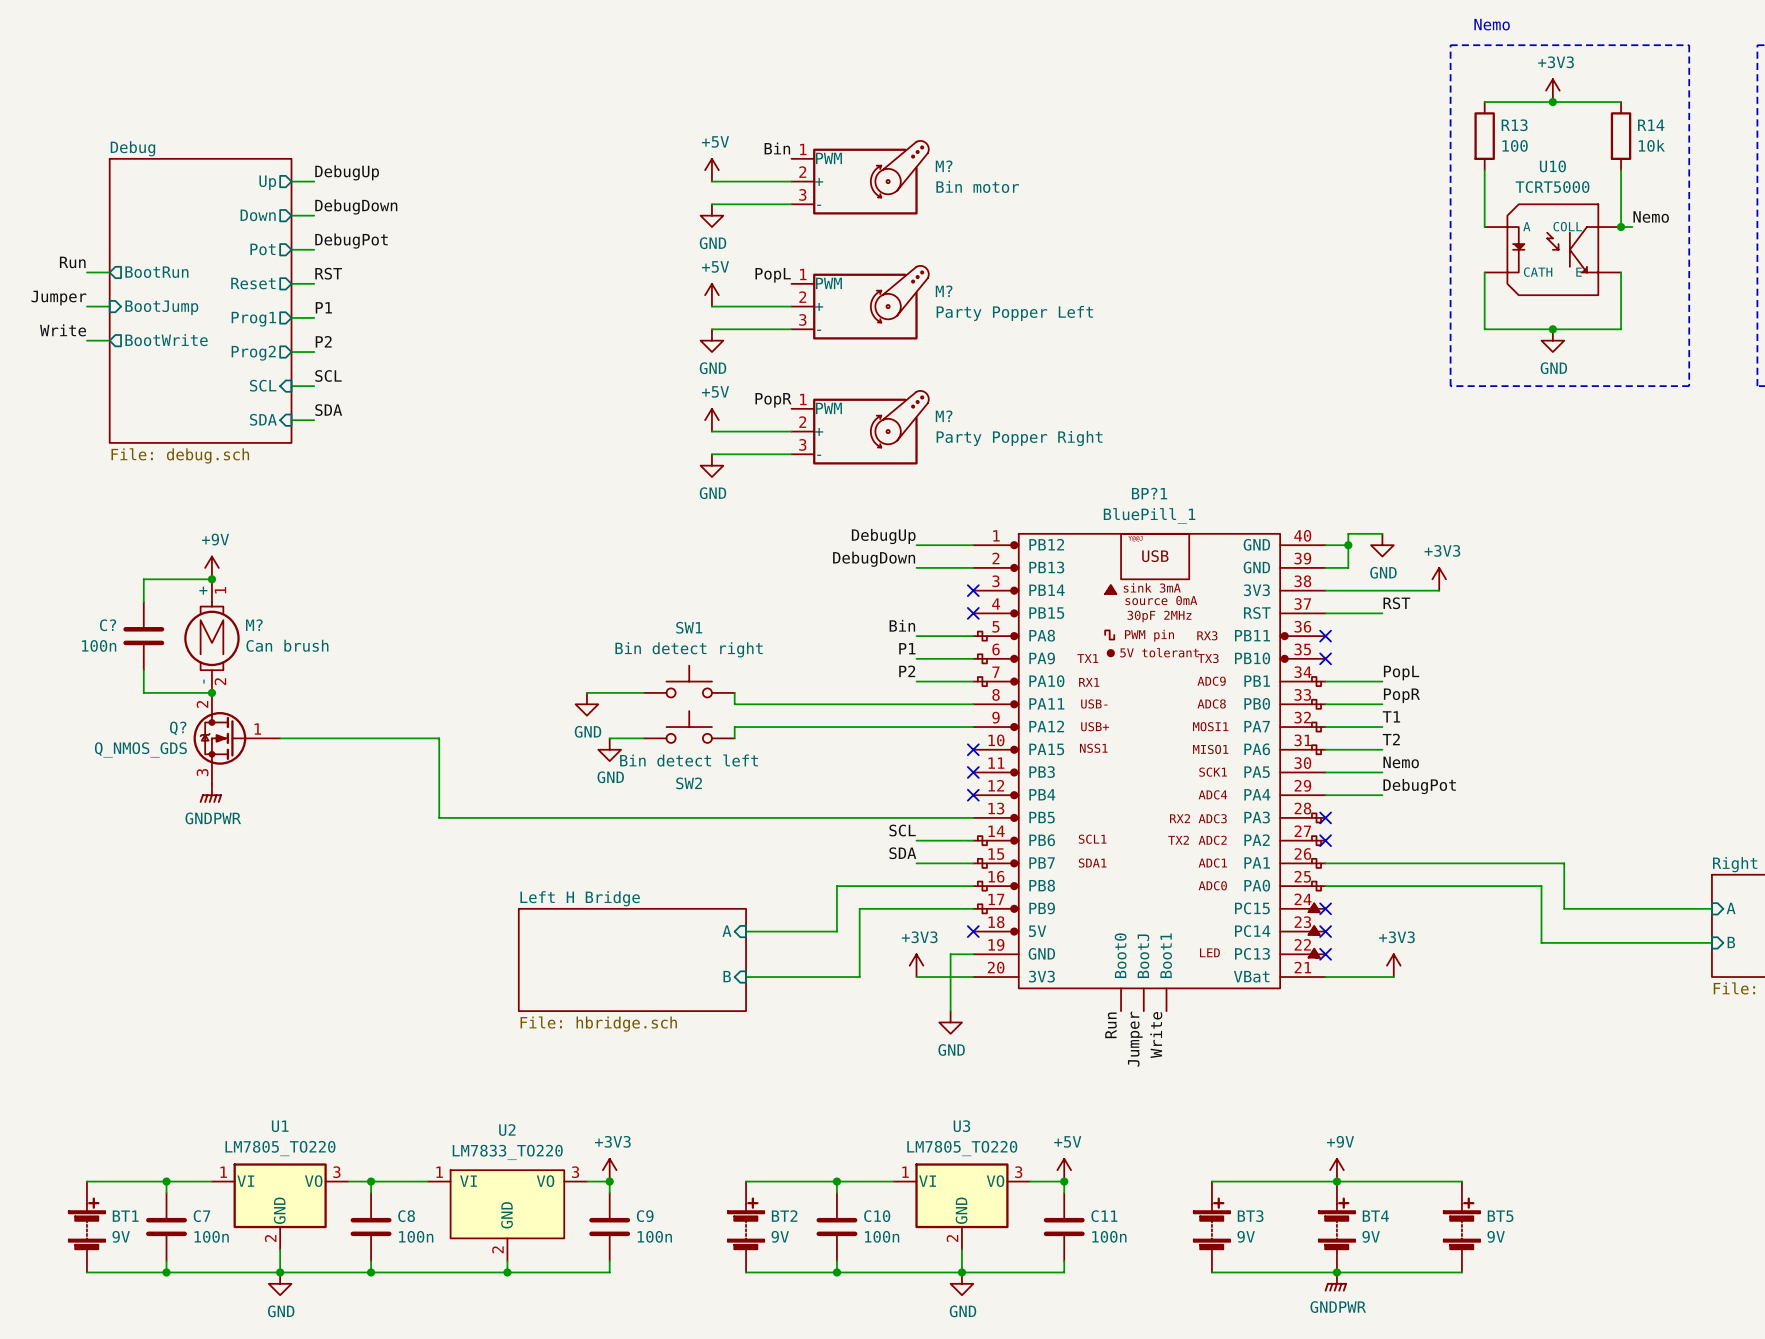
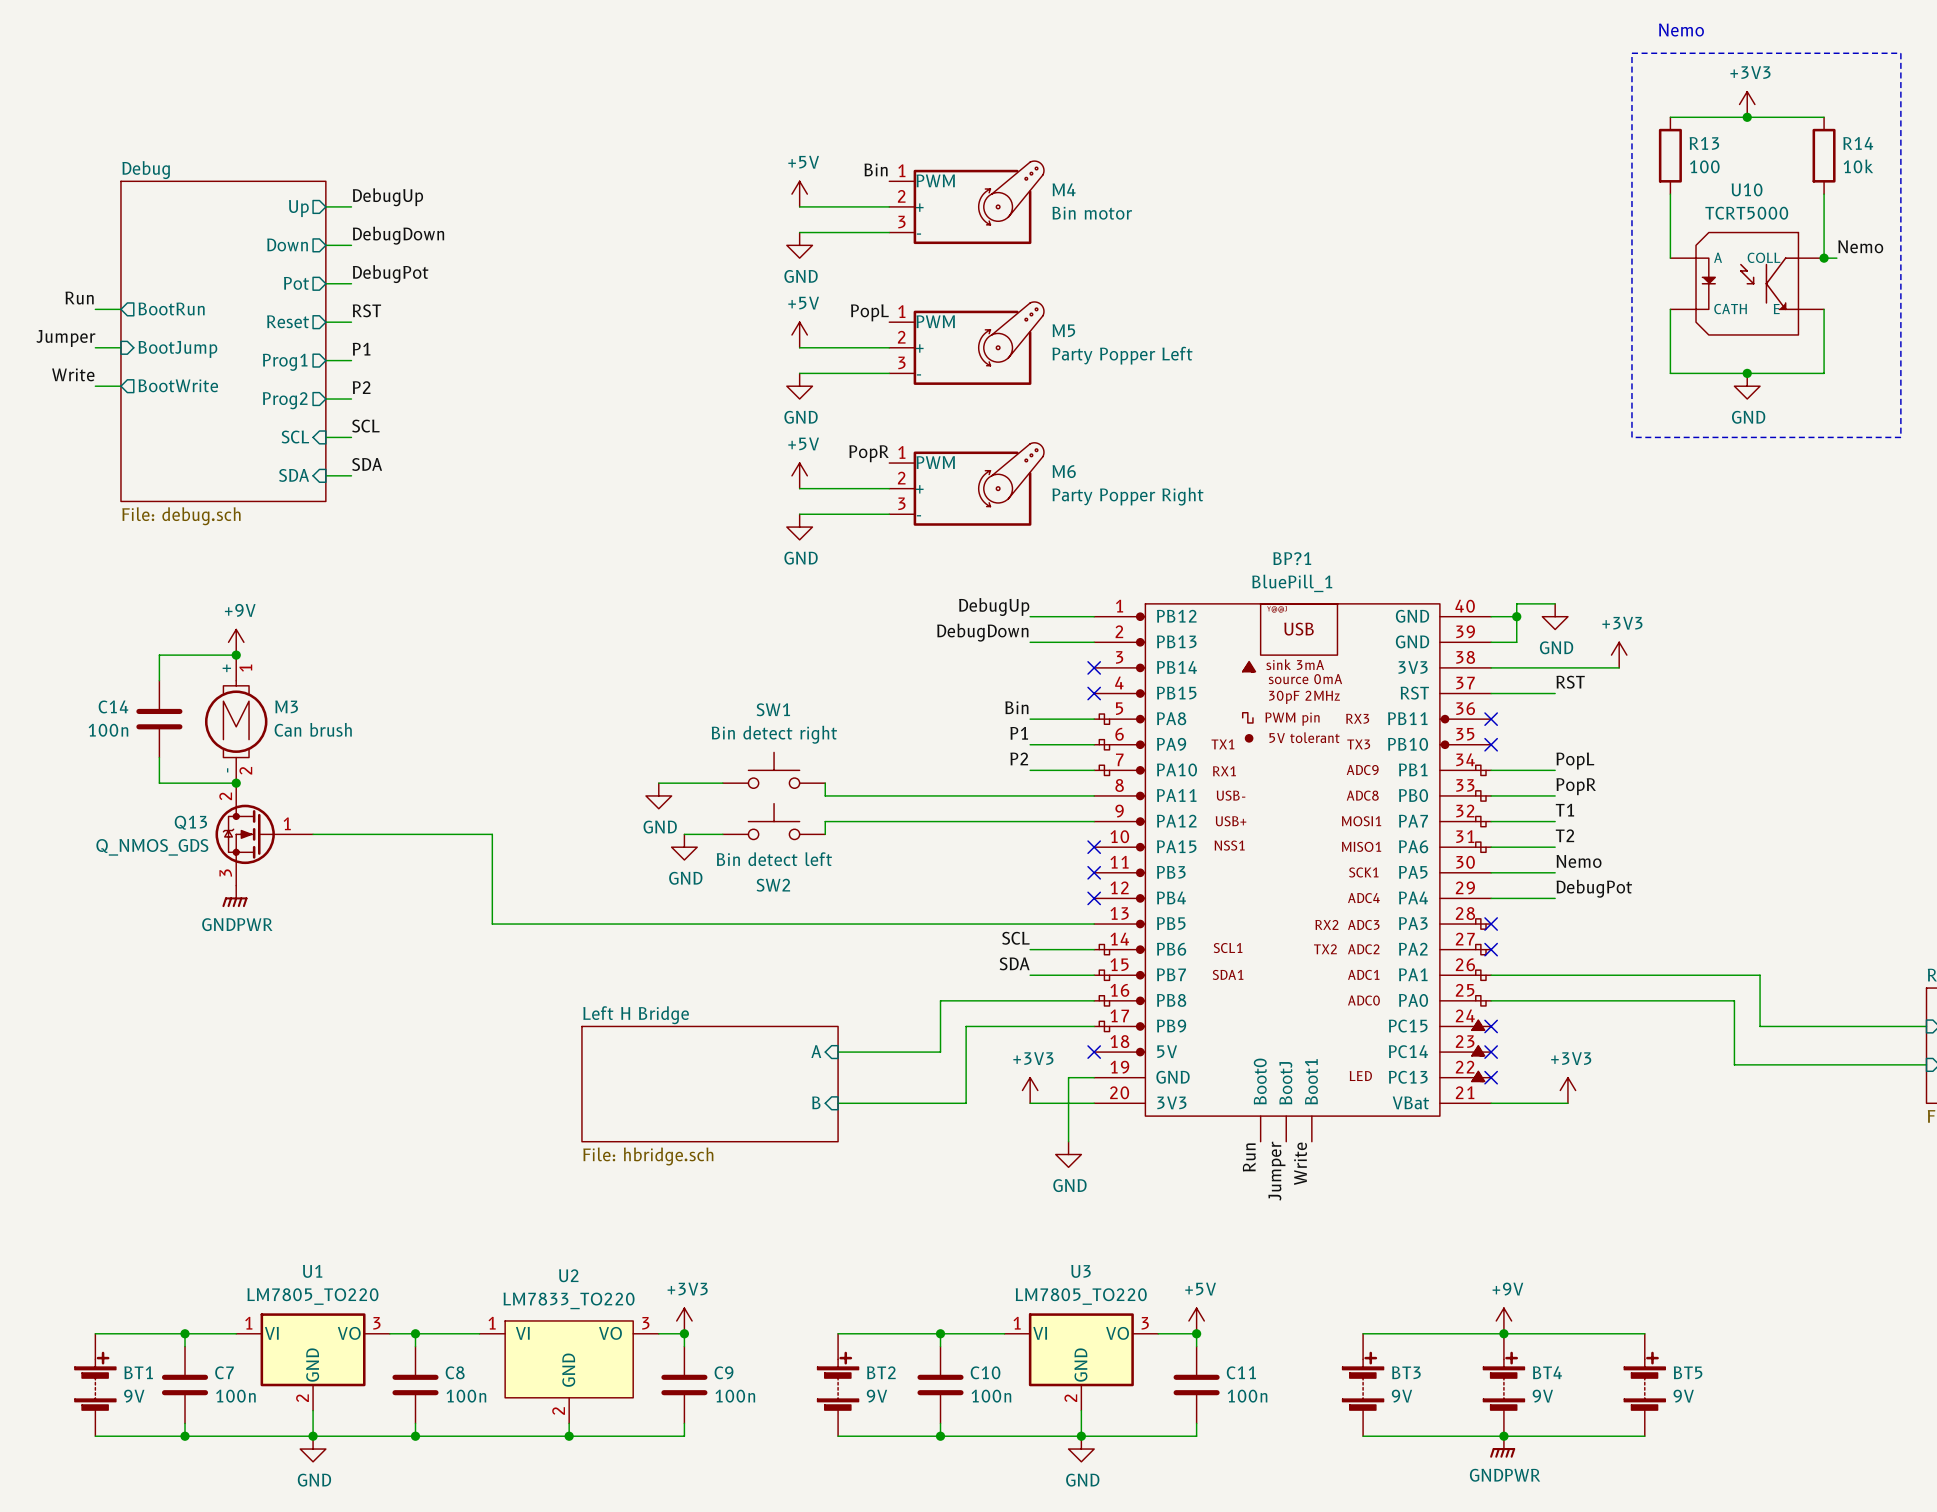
M? name: M? (944, 166) -> M4 (1064, 189)
M? name: M? (944, 291) -> M5 (1063, 330)
M? name: M? (944, 416) -> M6 (1064, 471)
C? name: C? (108, 625) -> C14 (113, 706)
M? name: M? (254, 625) -> M3 (286, 706)
Q? name: Q? (178, 728) -> Q13 (190, 822)

